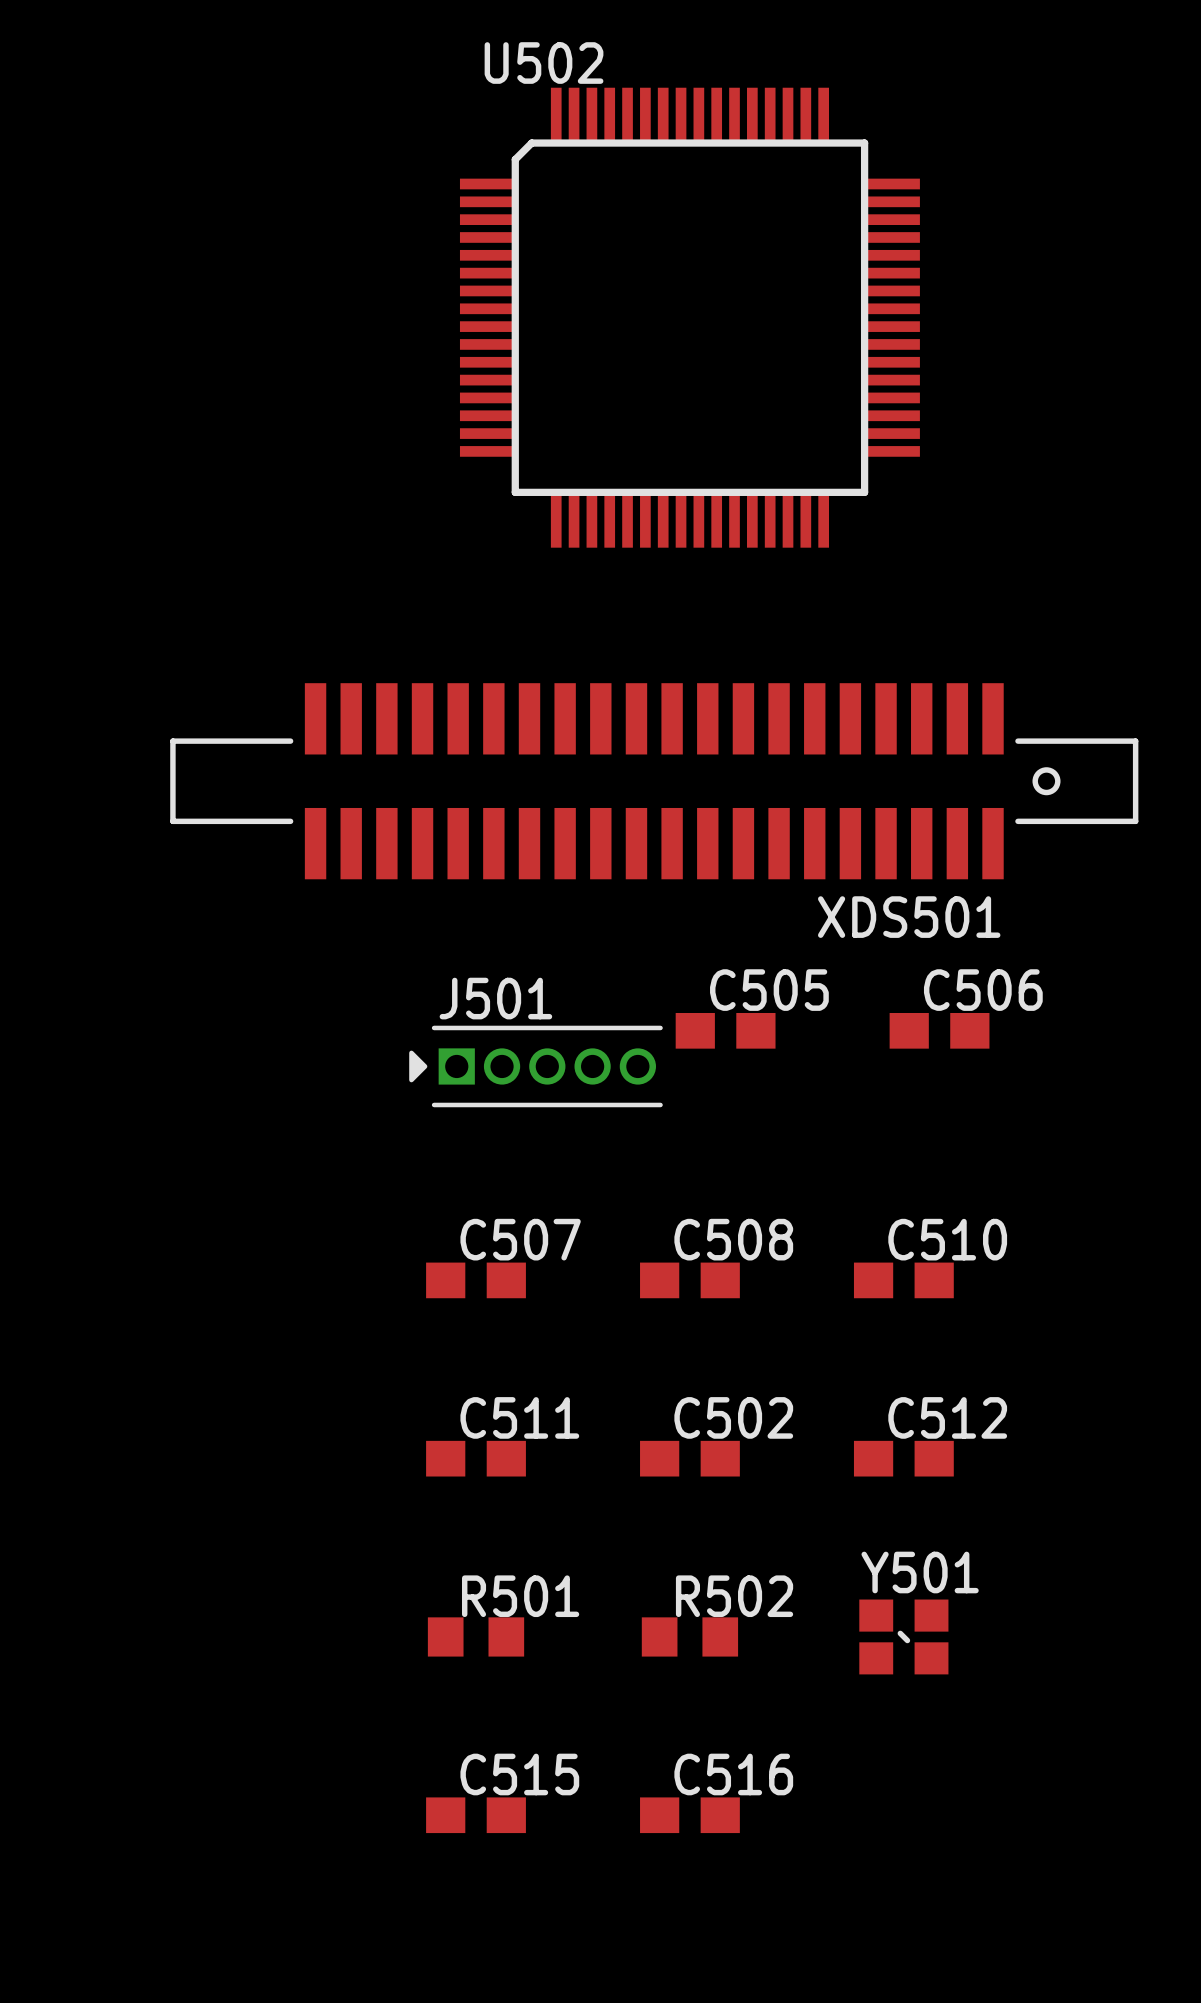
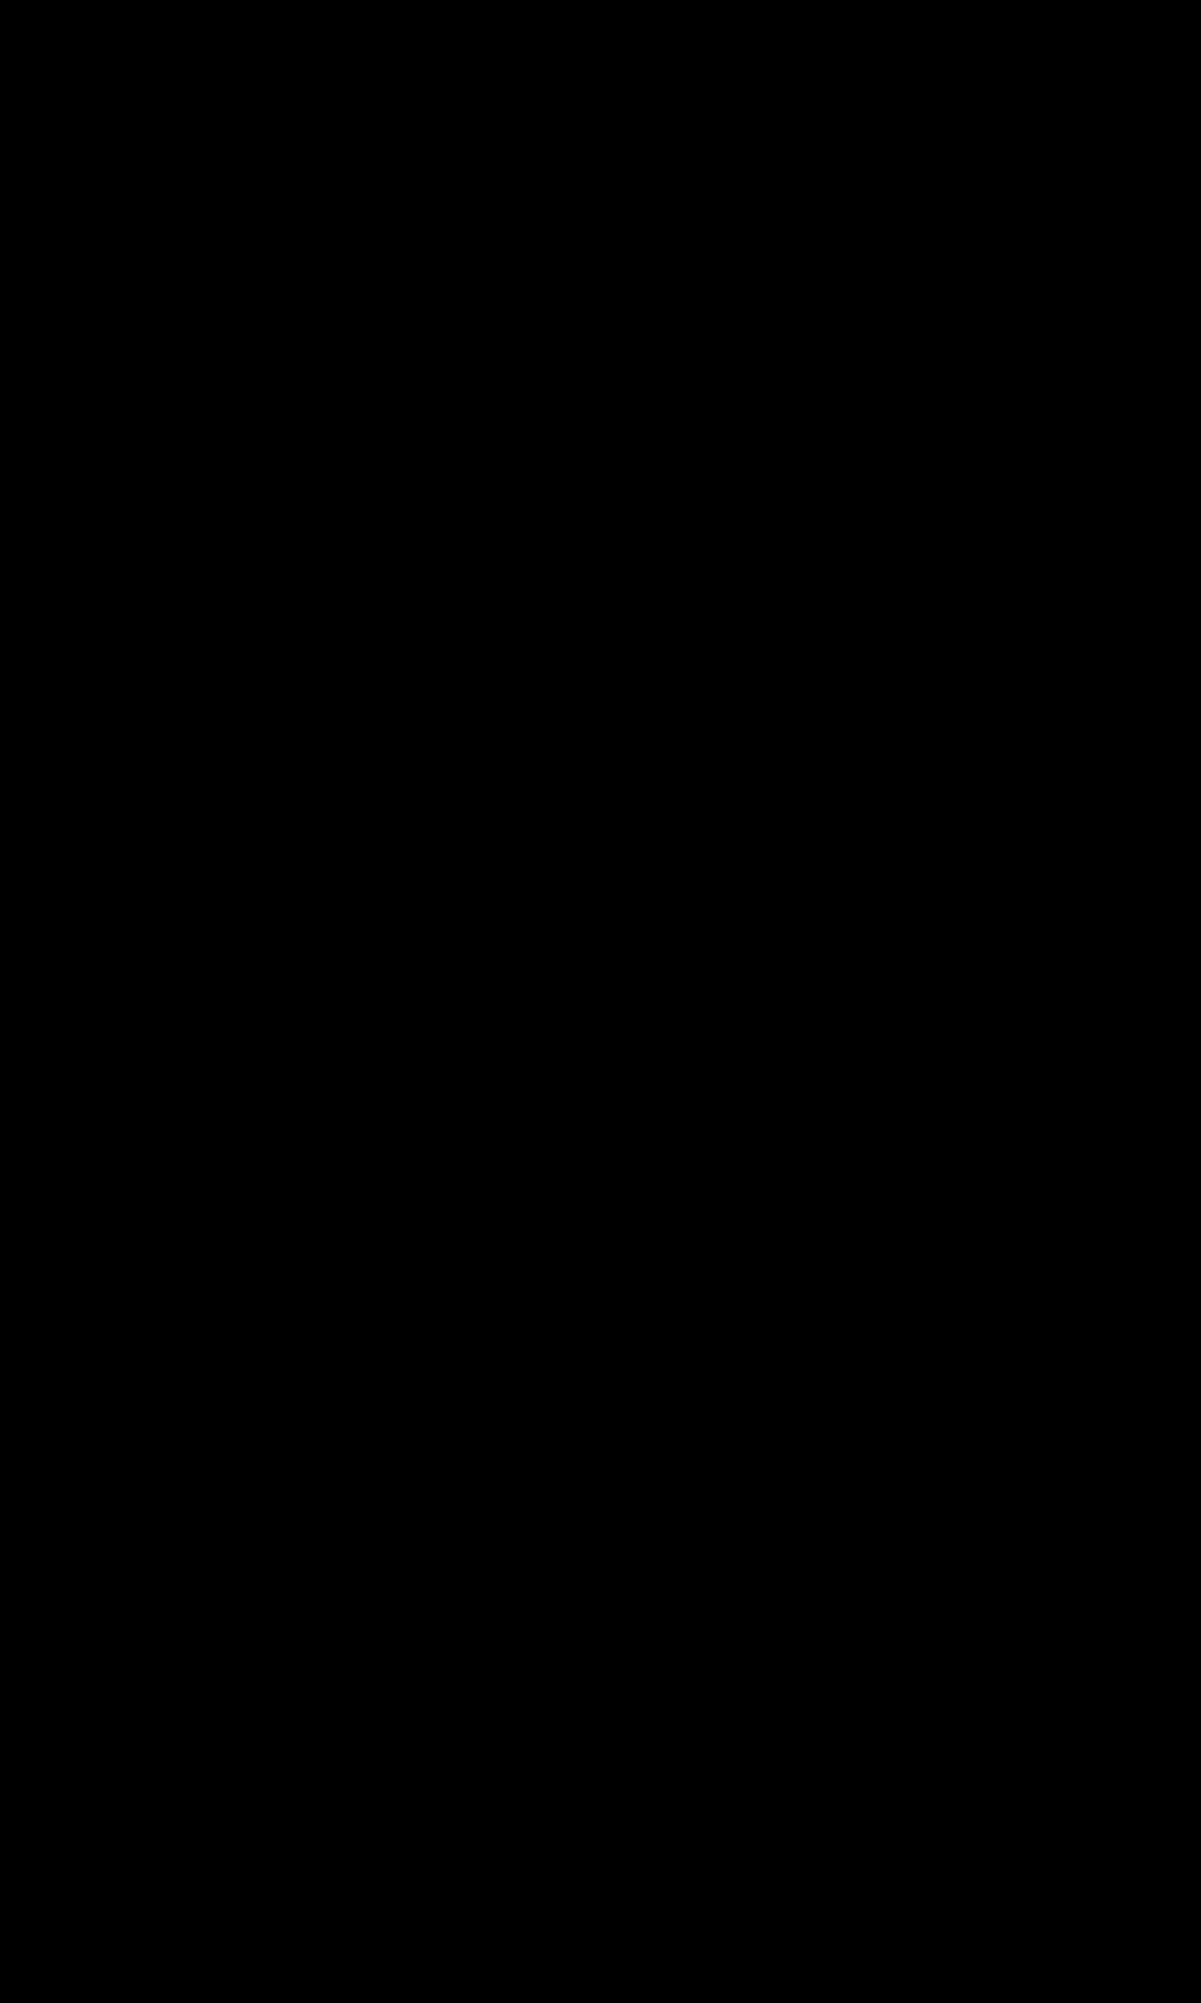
U502: (689, 317) -> none
XDS501: (654, 781) -> none
C505: (725, 1030) -> none
C506: (939, 1030) -> none
J501: (536, 1066) -> none
C507: (476, 1280) -> none
C508: (689, 1280) -> none
C510: (903, 1280) -> none
C511: (476, 1458) -> none
C502: (689, 1458) -> none
C512: (903, 1458) -> none
R501: (476, 1636) -> none
R502: (689, 1636) -> none
Y501: (903, 1636) -> none
C515: (476, 1815) -> none
C516: (689, 1815) -> none

